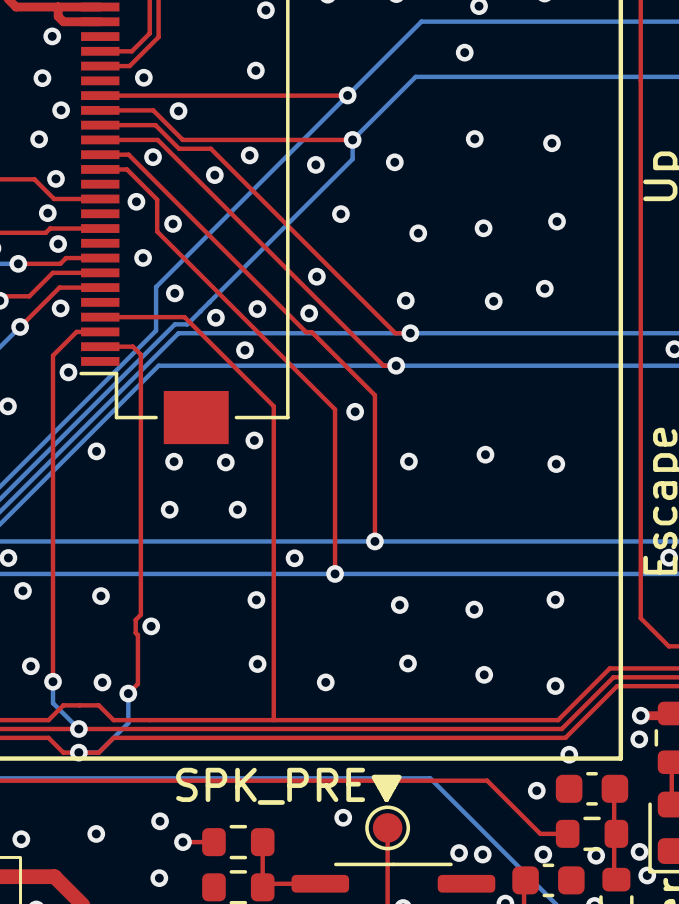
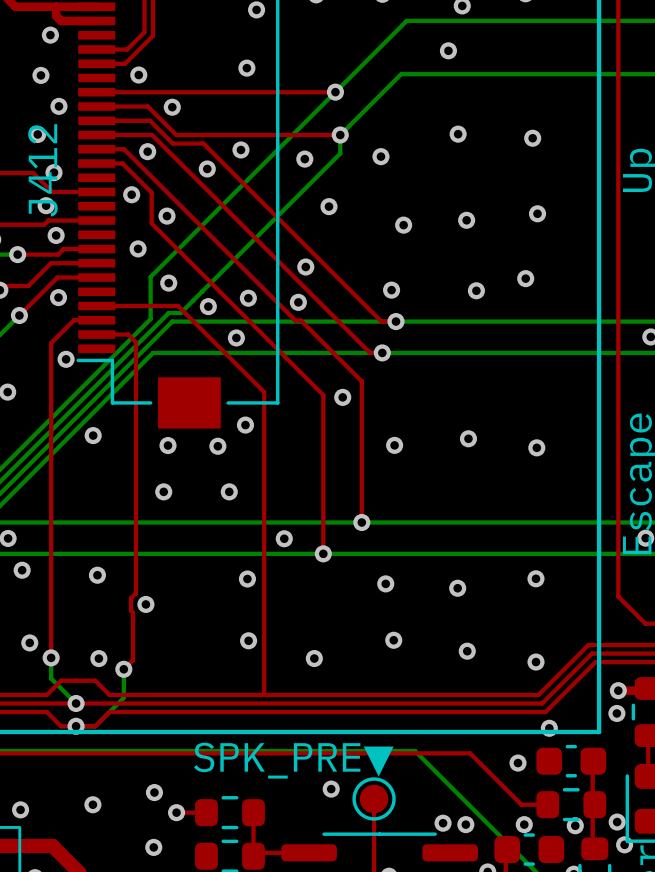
J412 name: none -> J412 (42, 170)

